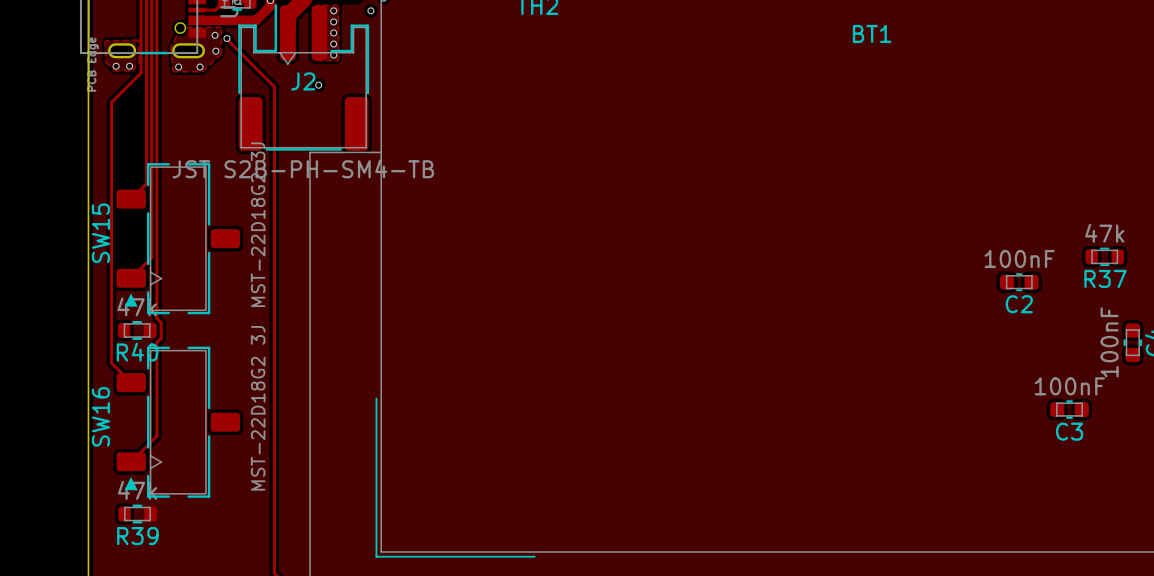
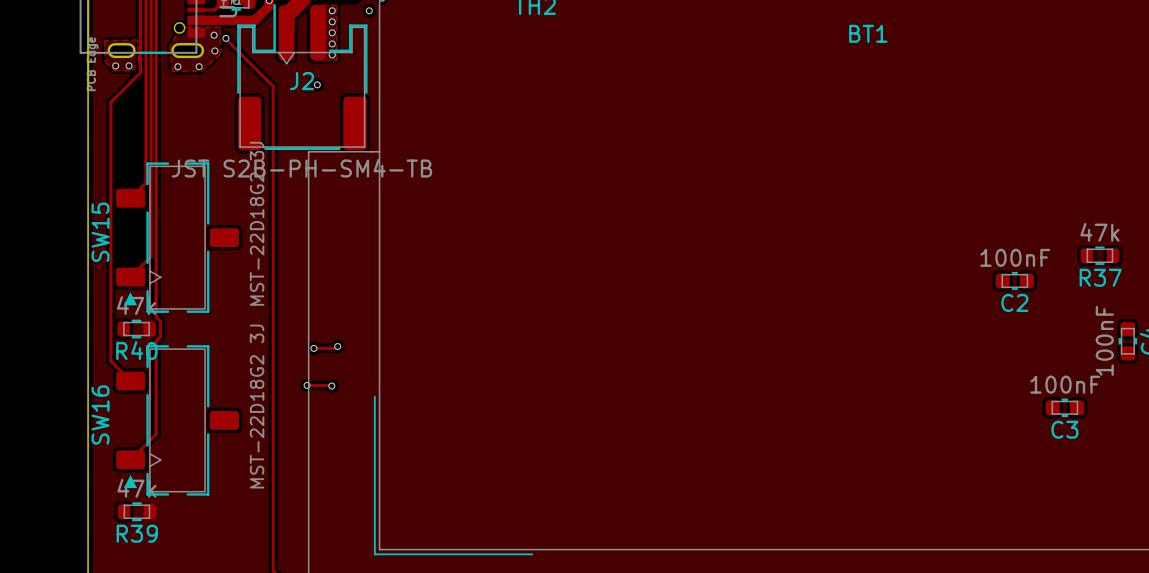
track: none -> (337, 346) (335, 348) (313, 348)
via: none -> (337, 346)
via: none -> (313, 348)
track: none -> (307, 385) (331, 386)
via: none -> (307, 385)
via: none -> (331, 386)

